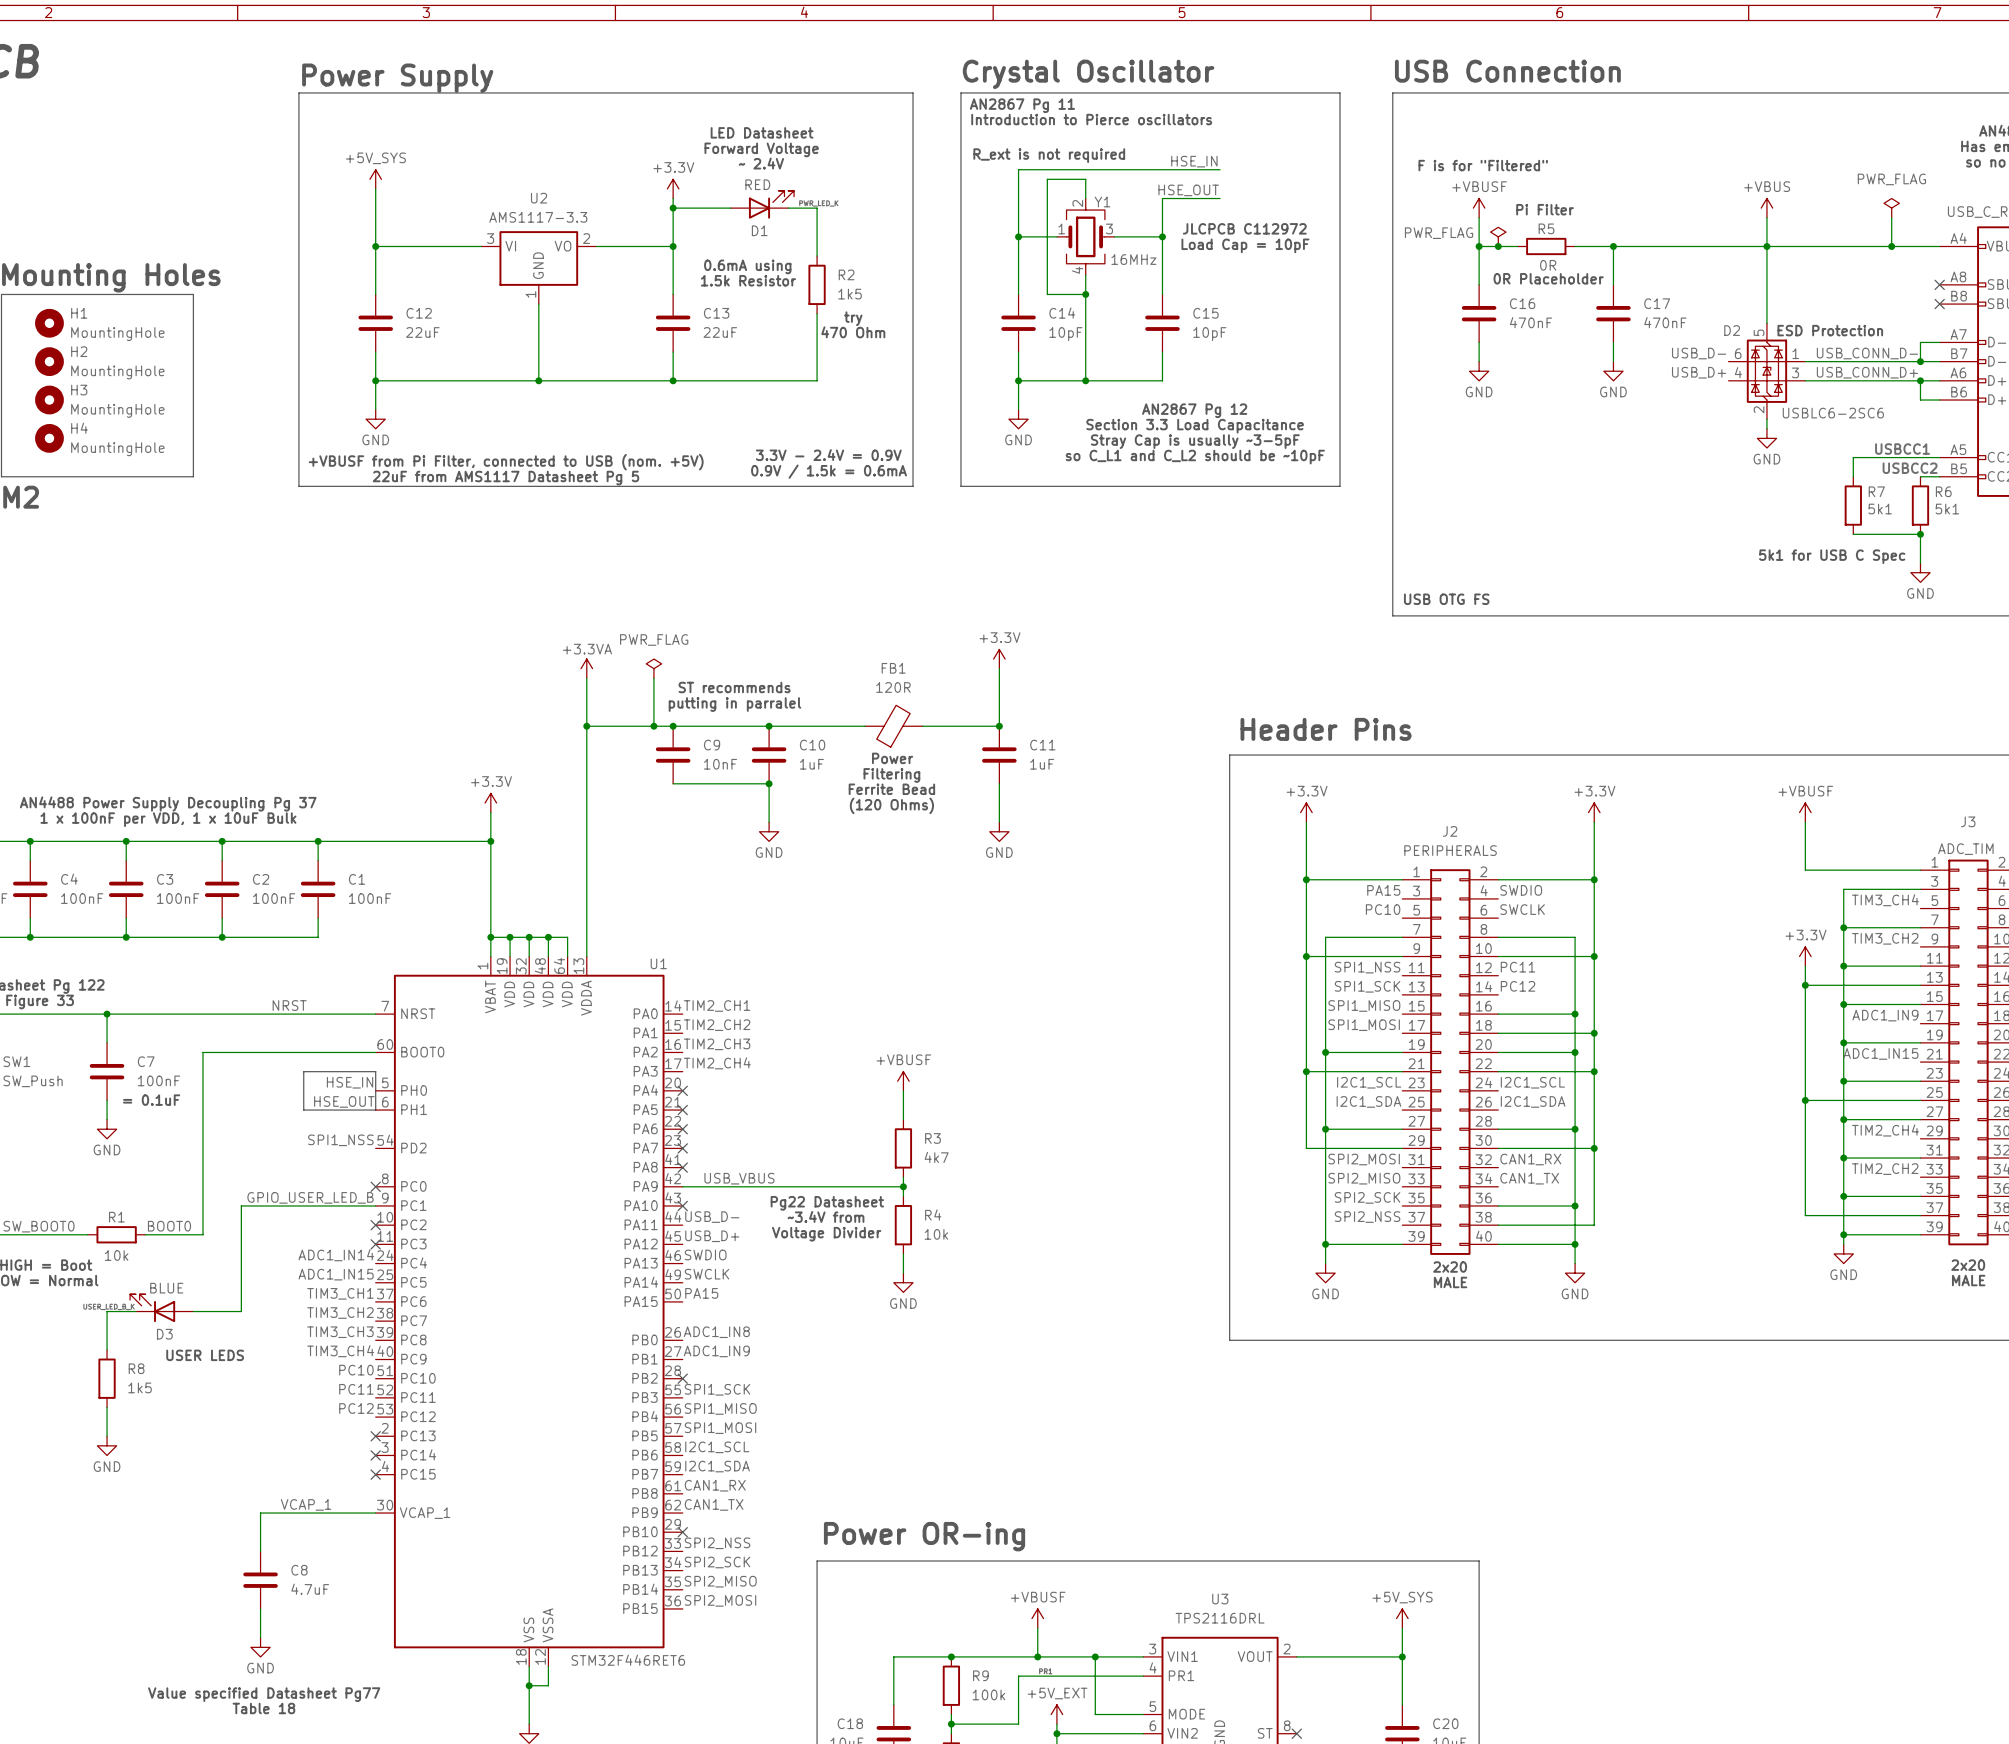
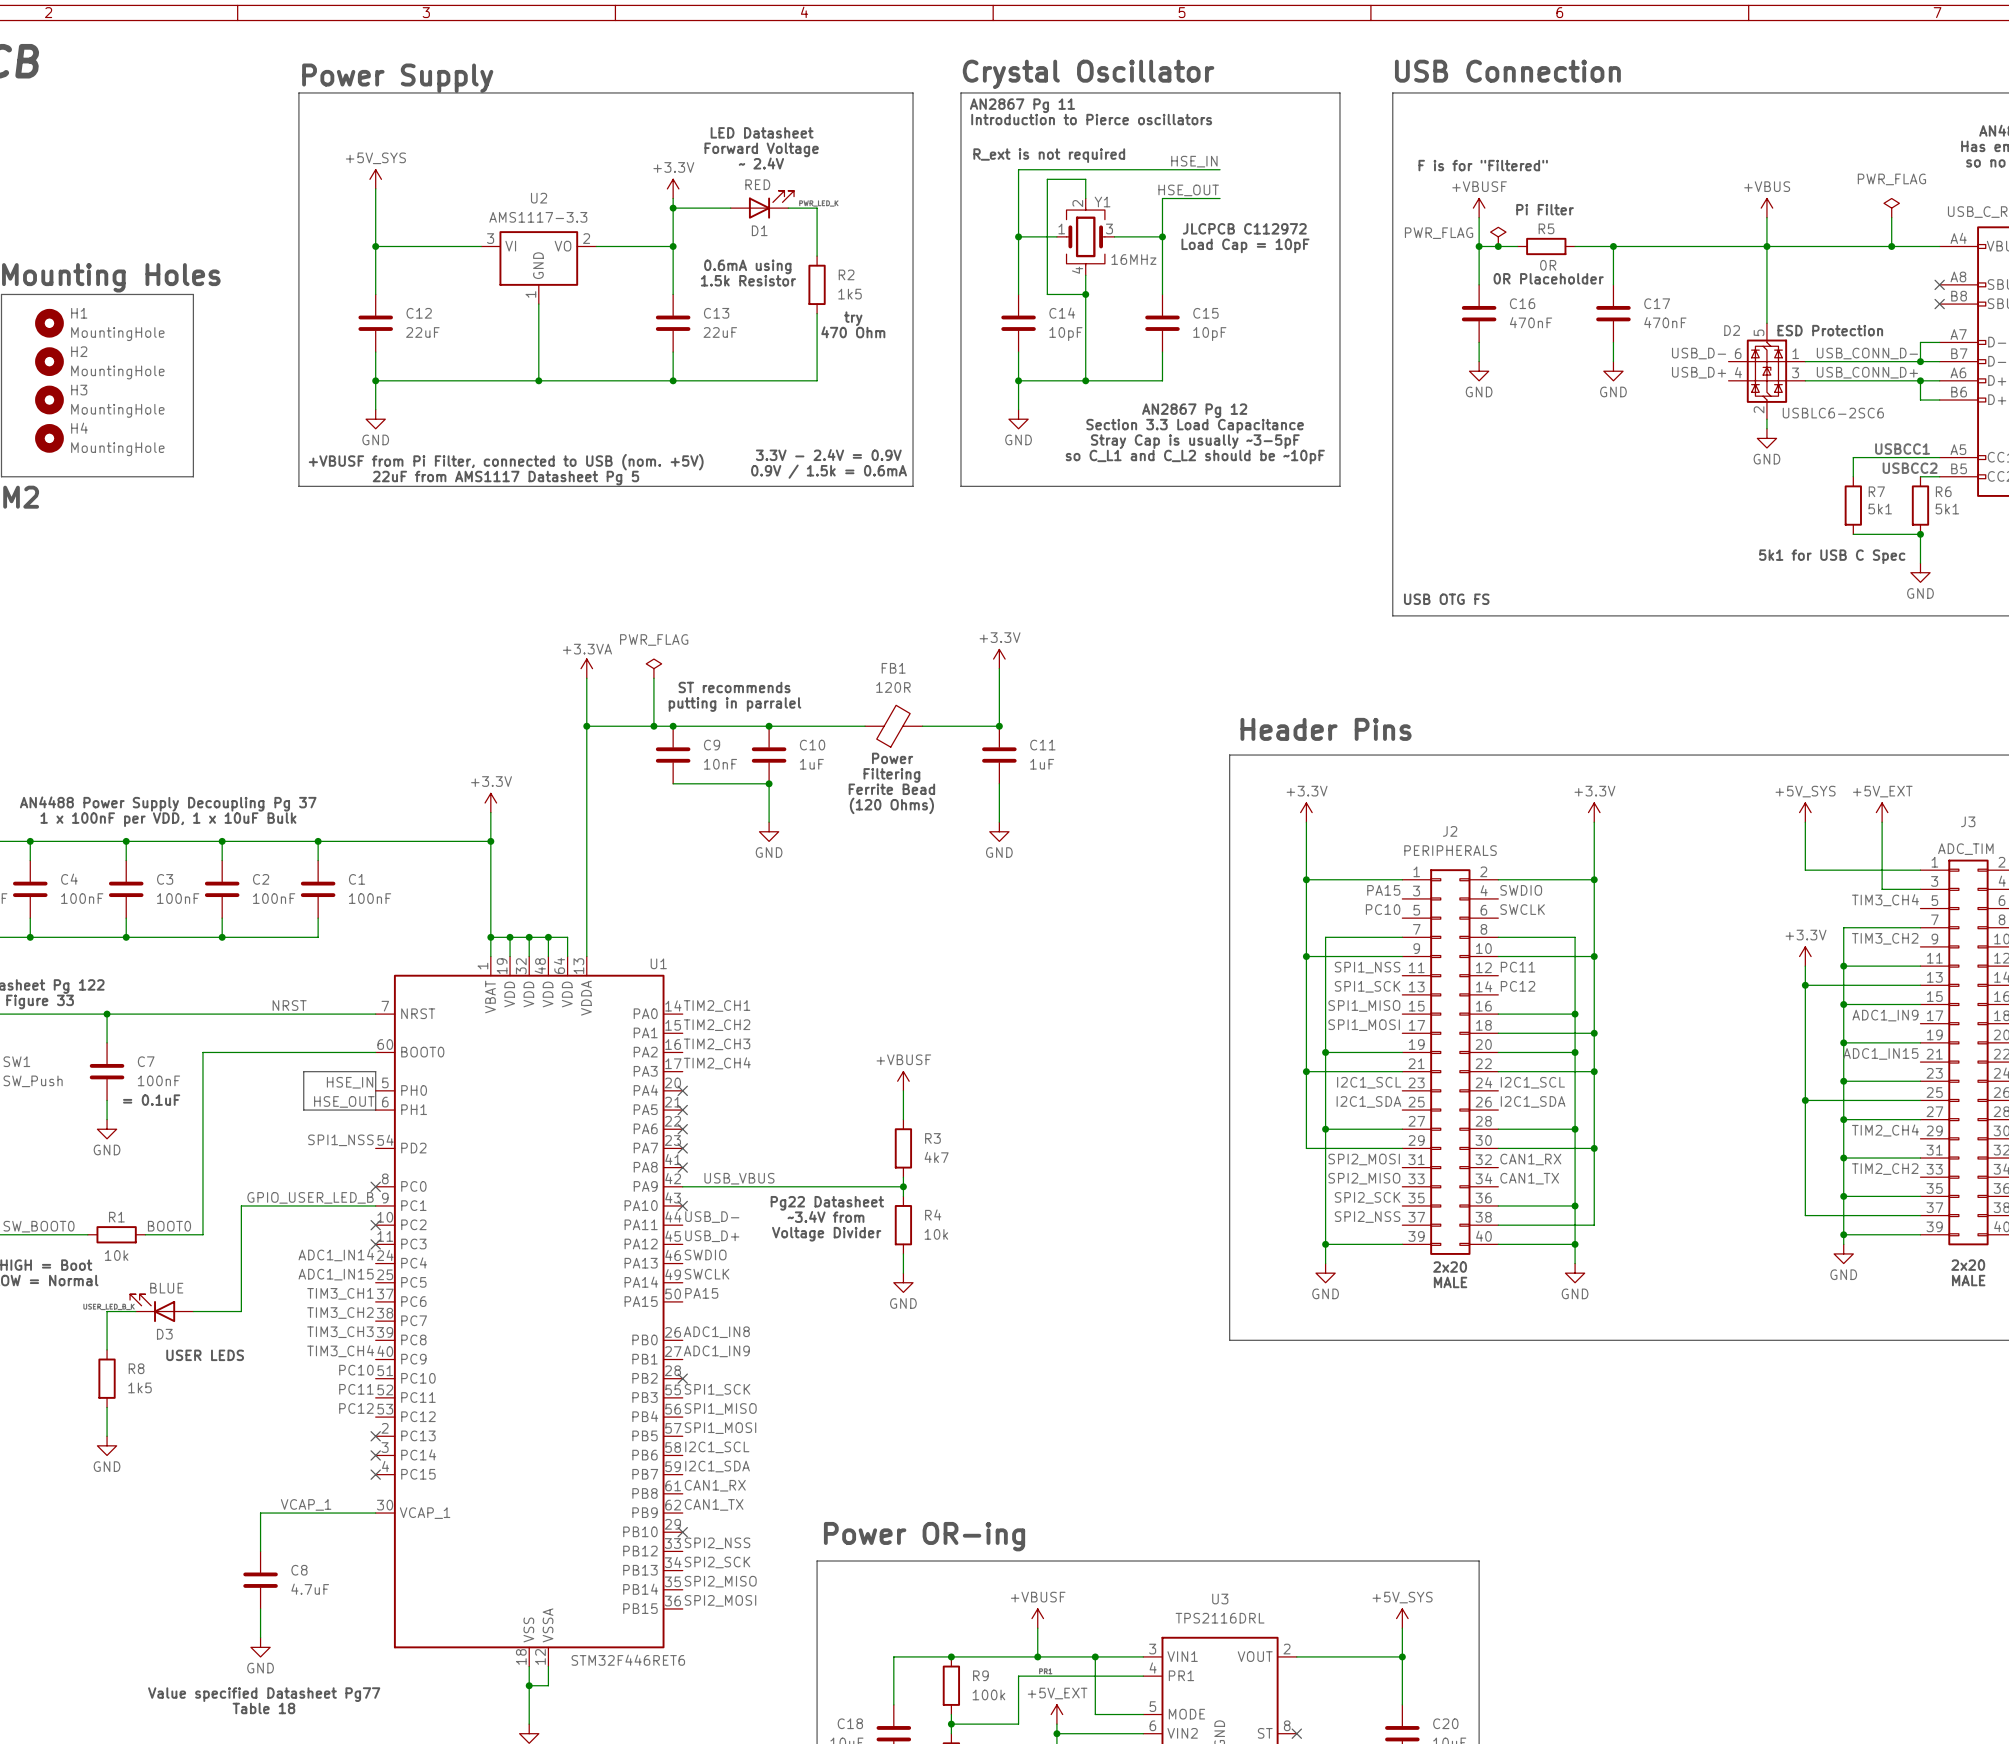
power symbol: +VBUSF (1805, 812) -> +5V_SYS (1805, 812)
power symbol: none -> +5V_EXT (1882, 812)
wire: (1882, 889) (1843, 889) (1843, 927) -> (1882, 889) (1882, 822)
junction: (1843, 927) -> none

